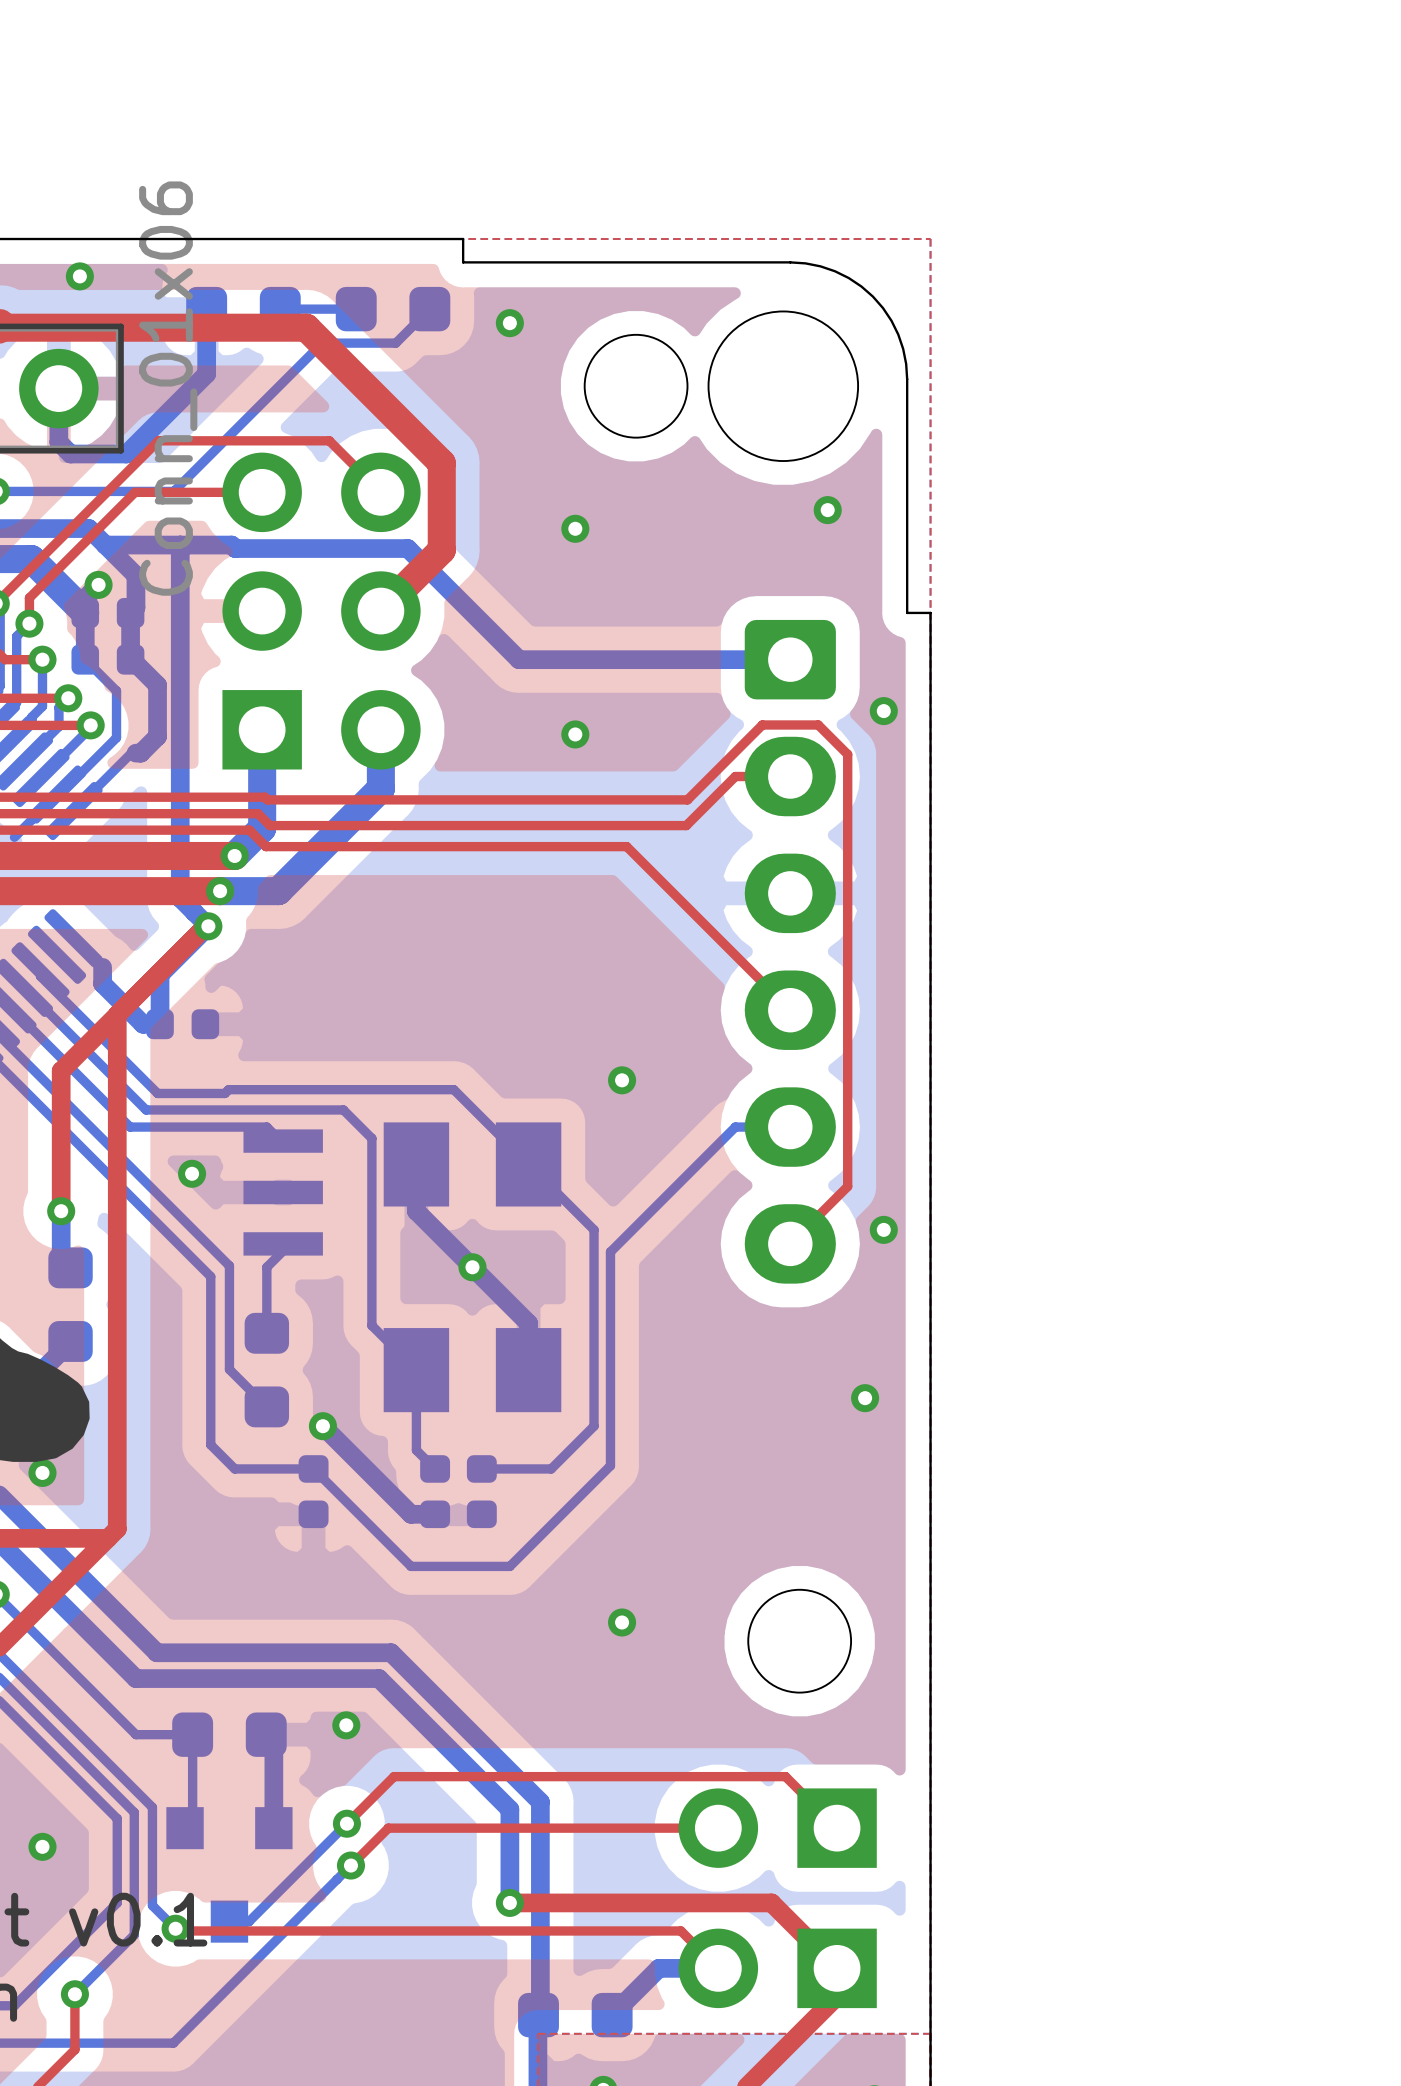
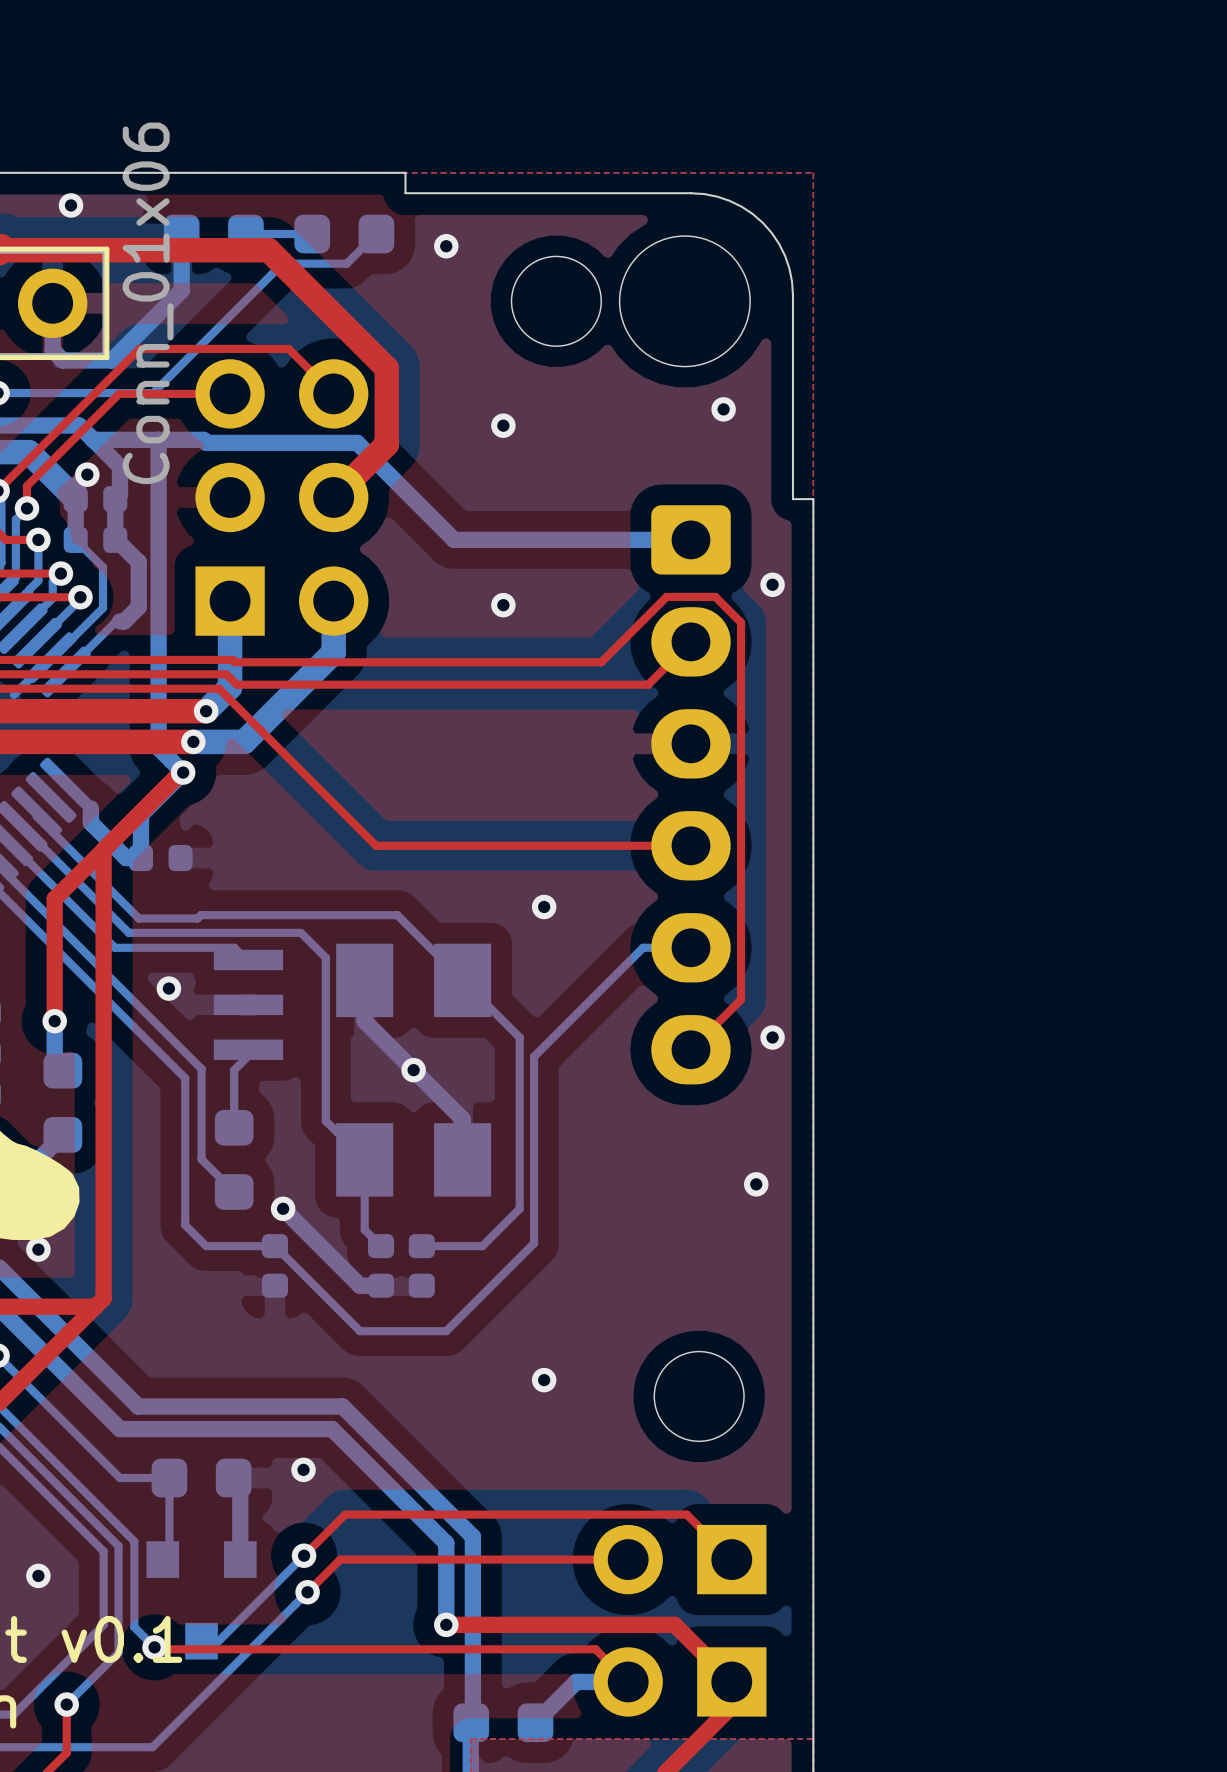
top track: (790, 776) (735, 776) (686, 825) -> (690, 641) (648, 684) (600, 684)
top track: (265, 846) (626, 846) (790, 1010) -> (233, 703) (376, 845) (690, 845)

